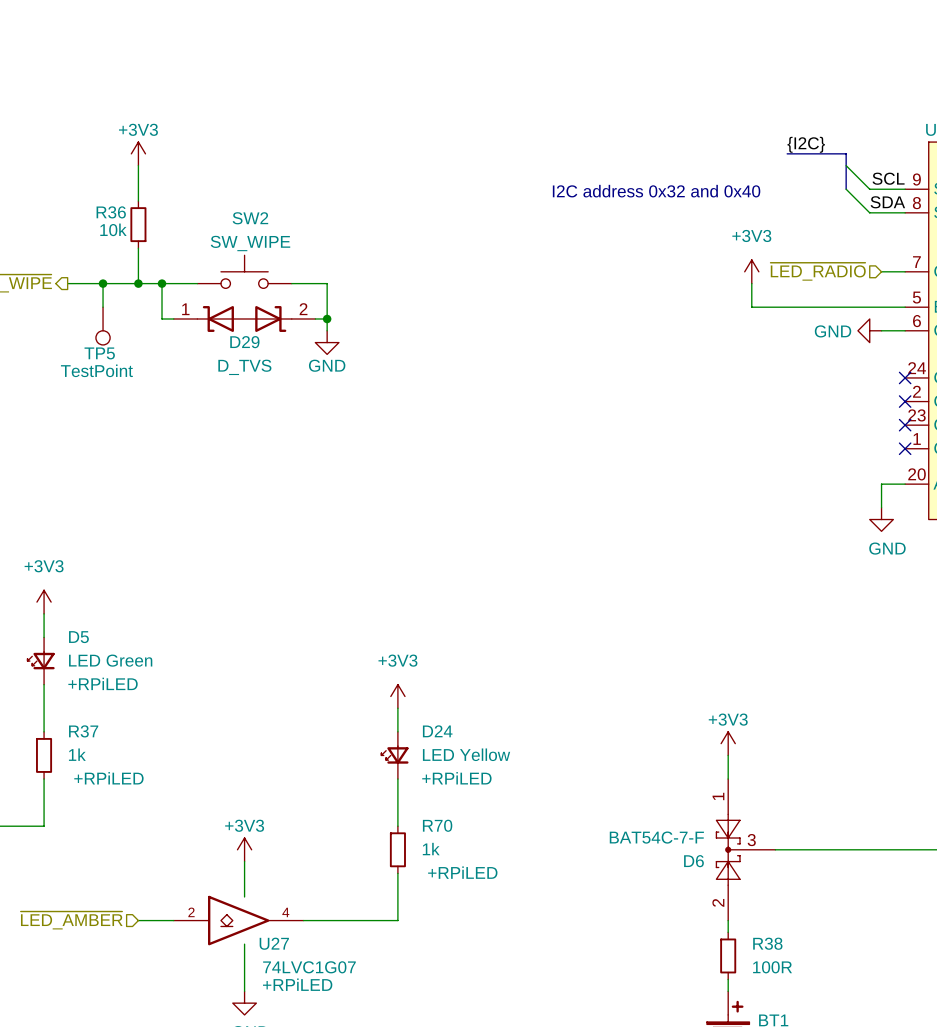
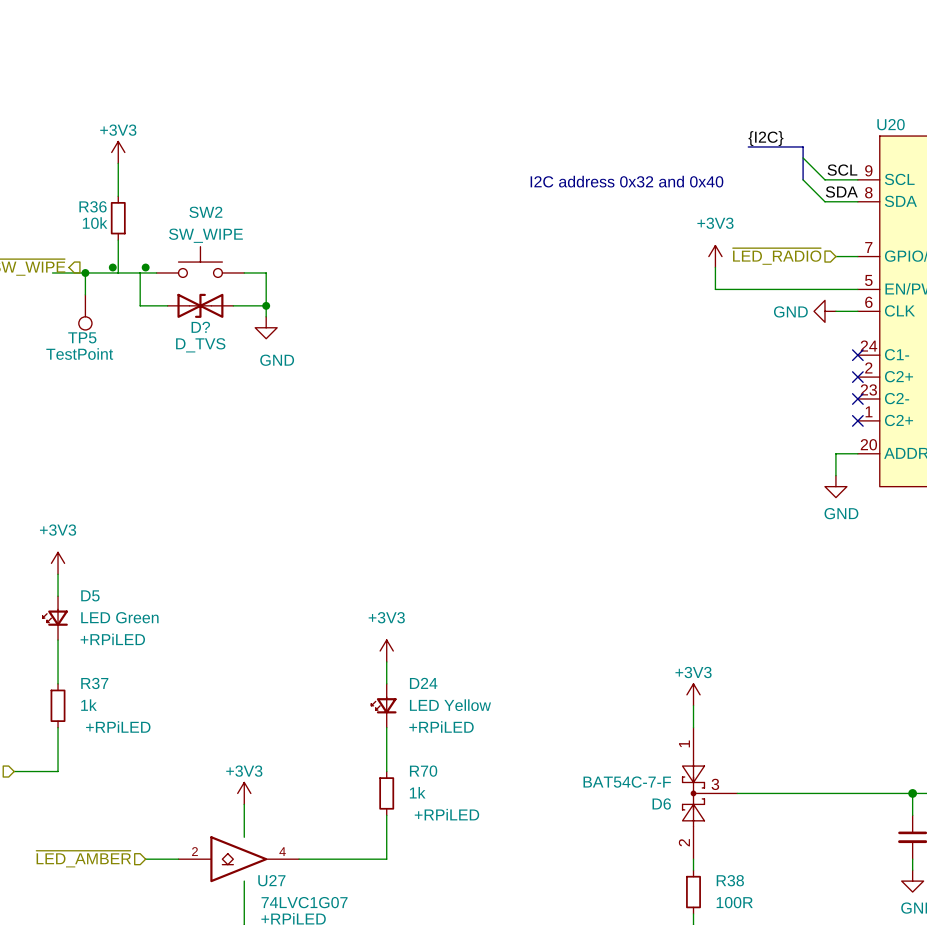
power symbol position: +3V3 (138, 153) -> +3V3 (118, 152)
wire: (138, 165) (138, 201) -> (118, 163) (118, 196)
R36 position: (138, 224) -> (118, 218)
wire: (138, 248) (138, 283) -> (118, 240) (118, 272)
SW2 position: (244, 271) -> (200, 262)
wire: (67, 283) (197, 283) -> none
wire: (103, 283) (103, 307) -> (85, 272) (85, 294)
wire: (162, 283) (162, 318) (173, 318) -> none
junction: (162, 283) -> none
wire: (291, 283) (327, 283) (327, 330) -> none
wire: none -> (52, 272) (156, 272)
junction: none -> (85, 272)
wire: none -> (140, 272) (140, 305) (167, 305)
wire: none -> (244, 272) (266, 272) (266, 316)
D29: D_TVS (244, 318) -> none
wire: (315, 318) (327, 318) -> none
junction: (327, 318) -> none
D?: none -> D_TVS (200, 305)
wire: none -> (233, 305) (266, 305)
junction: none -> (266, 305)
TP5 position: (103, 326) -> (85, 312)
power symbol position: GND (327, 342) -> GND (266, 327)
power symbol text position: GND (327, 365) -> GND (277, 360)

